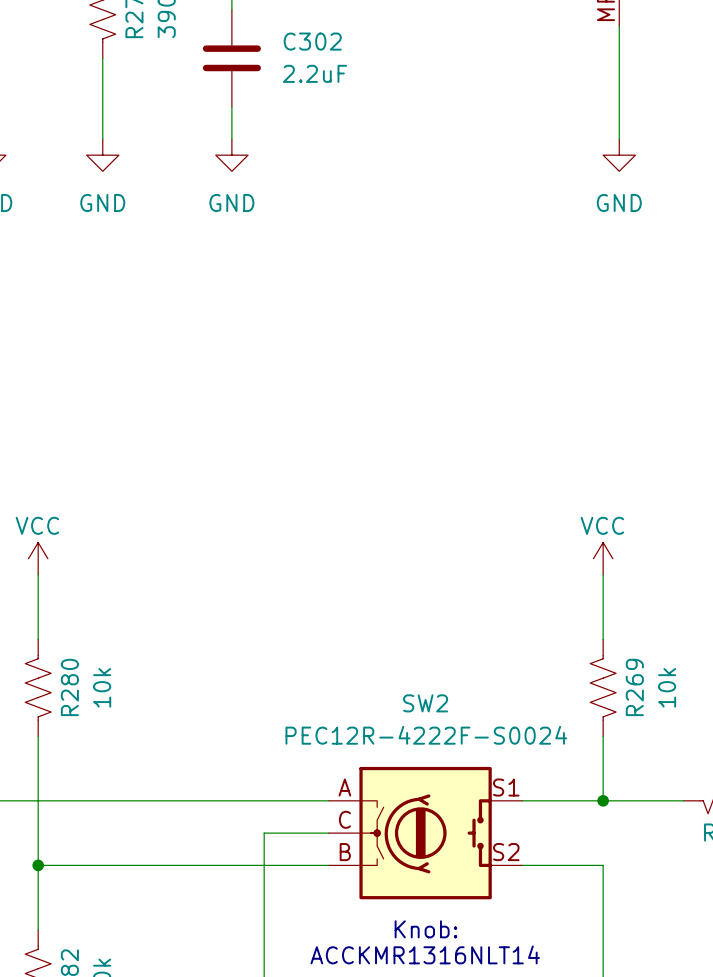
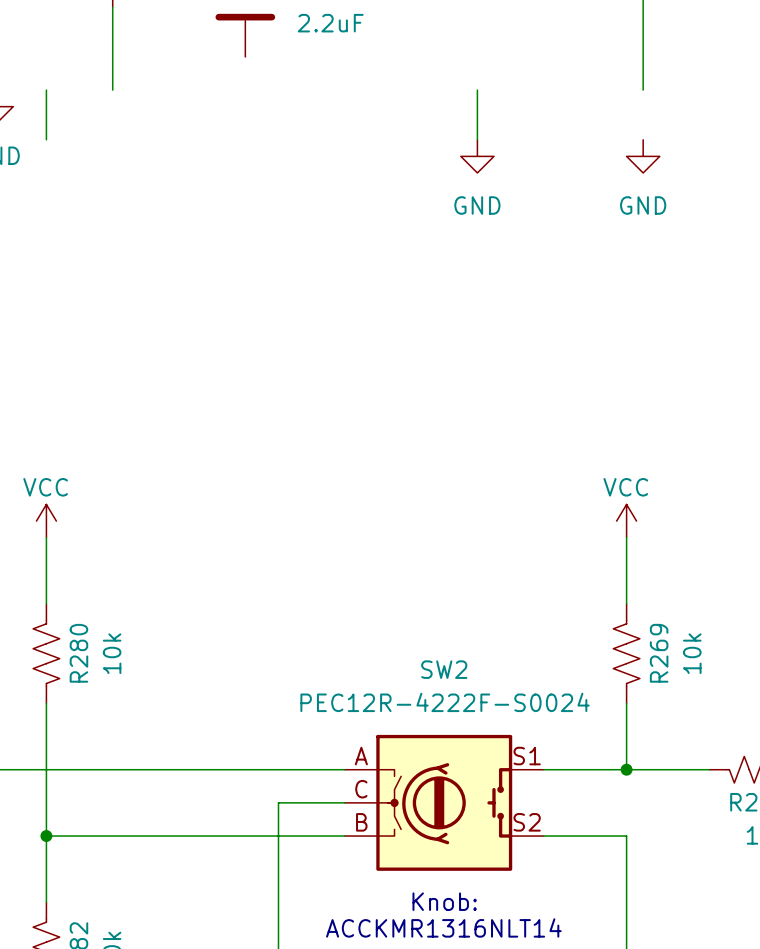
wire: (231, 106) (231, 139) -> none
wire: none -> (46, 90) (46, 139)
wire: none -> (477, 90) (477, 139)
power symbol: GND (102, 155) -> none
power symbol: GND (231, 155) -> none
power symbol position: GND (619, 155) -> GND (643, 156)
power symbol: none -> GND (477, 156)

